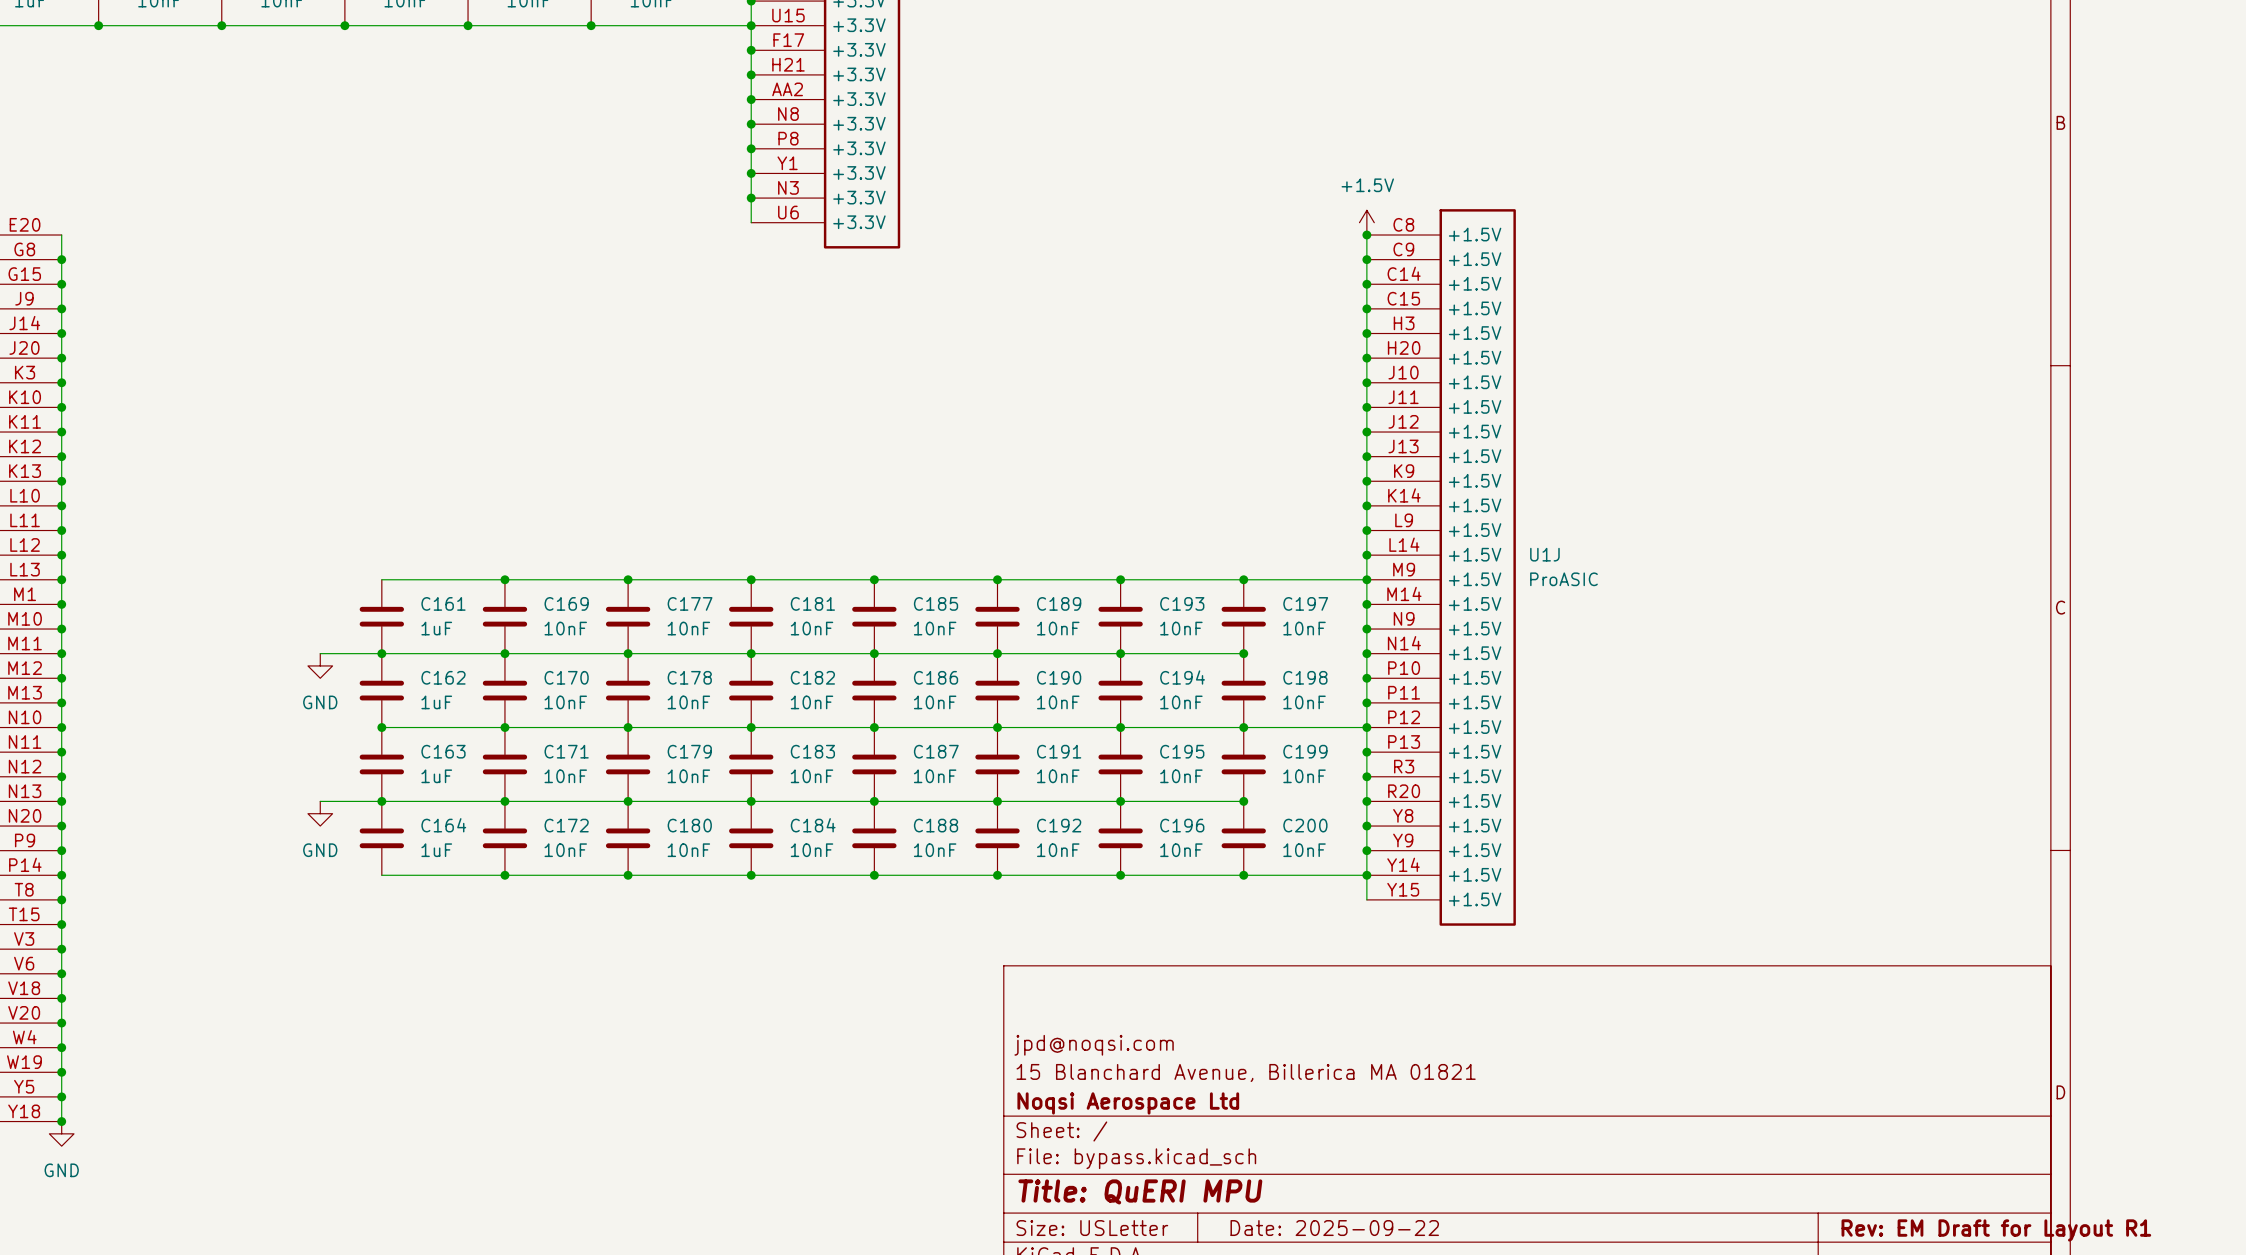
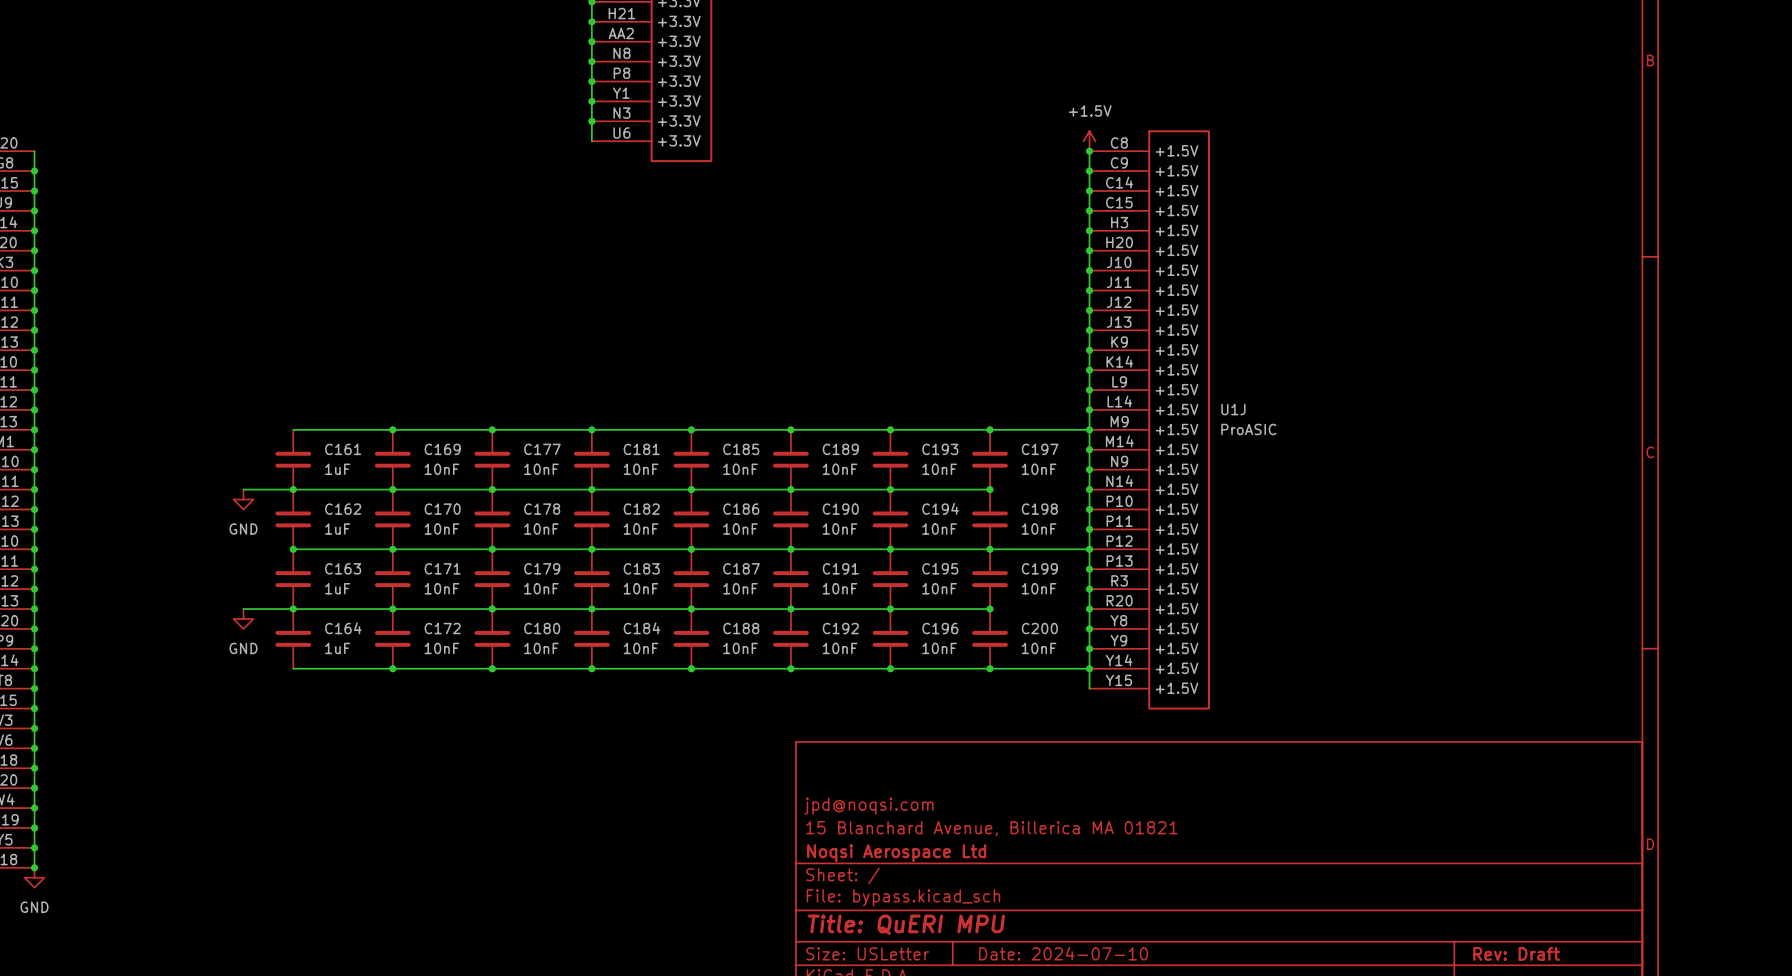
title block: Date: 2025-09-22 (1334, 1228) -> Date: 2024-07-10 (1063, 953)
title block: Rev: EM Draft for Layout R1 (1996, 1230) -> Rev: Draft (1516, 953)

